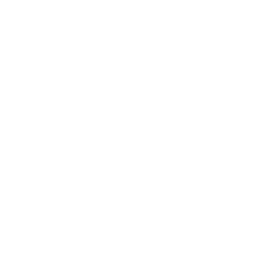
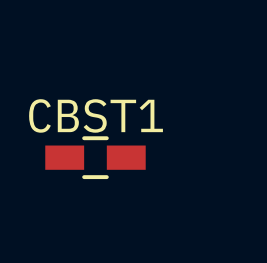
CBST1: none -> (95, 157)

